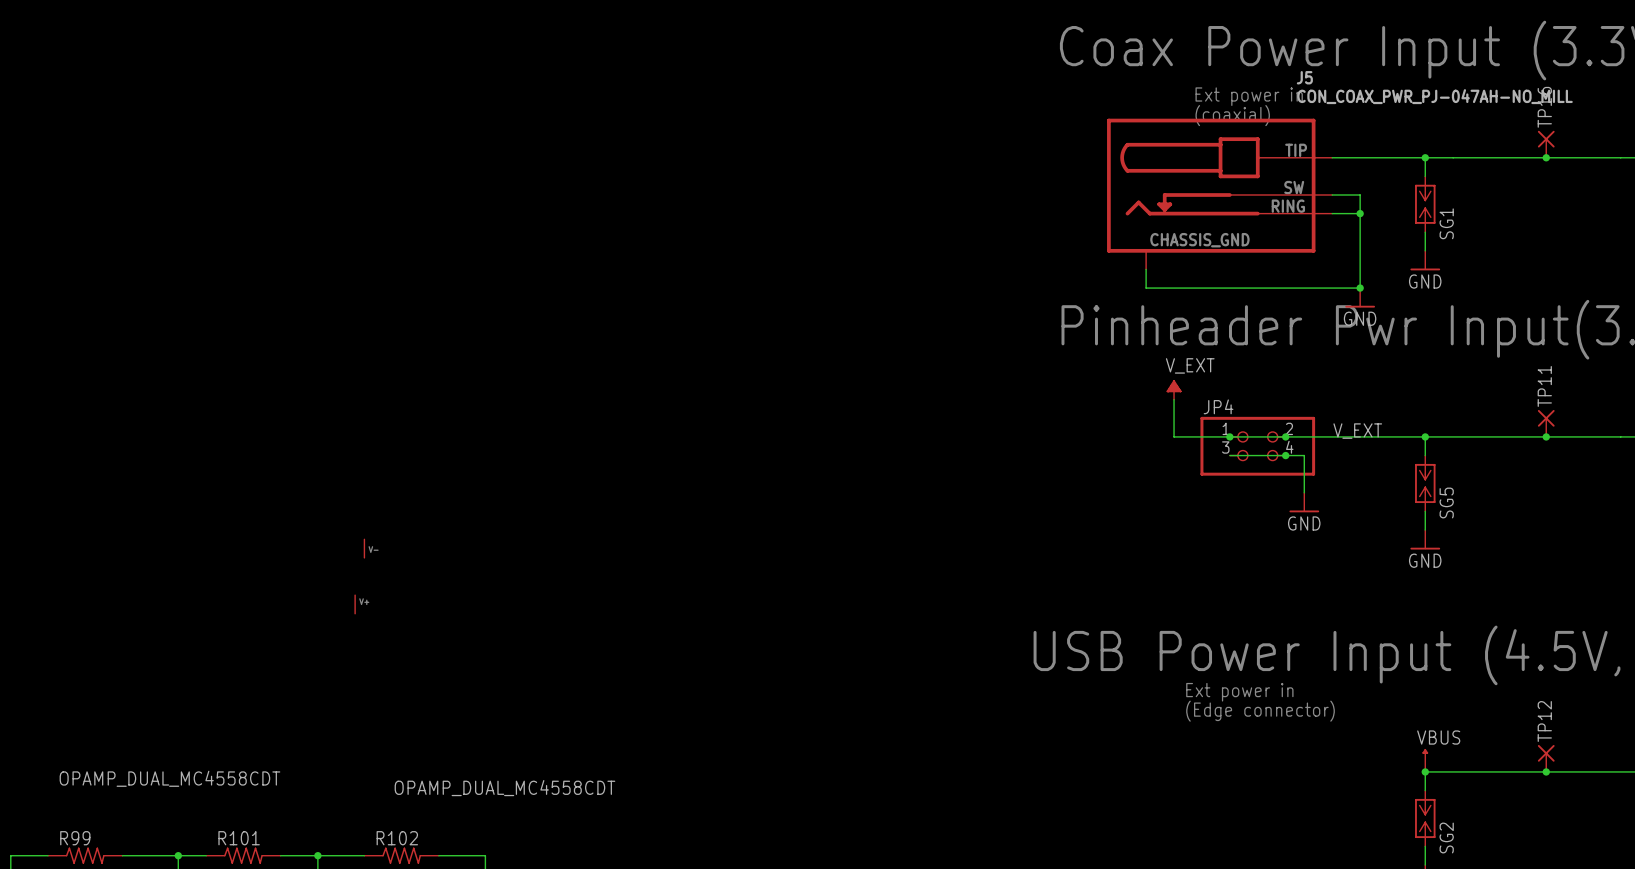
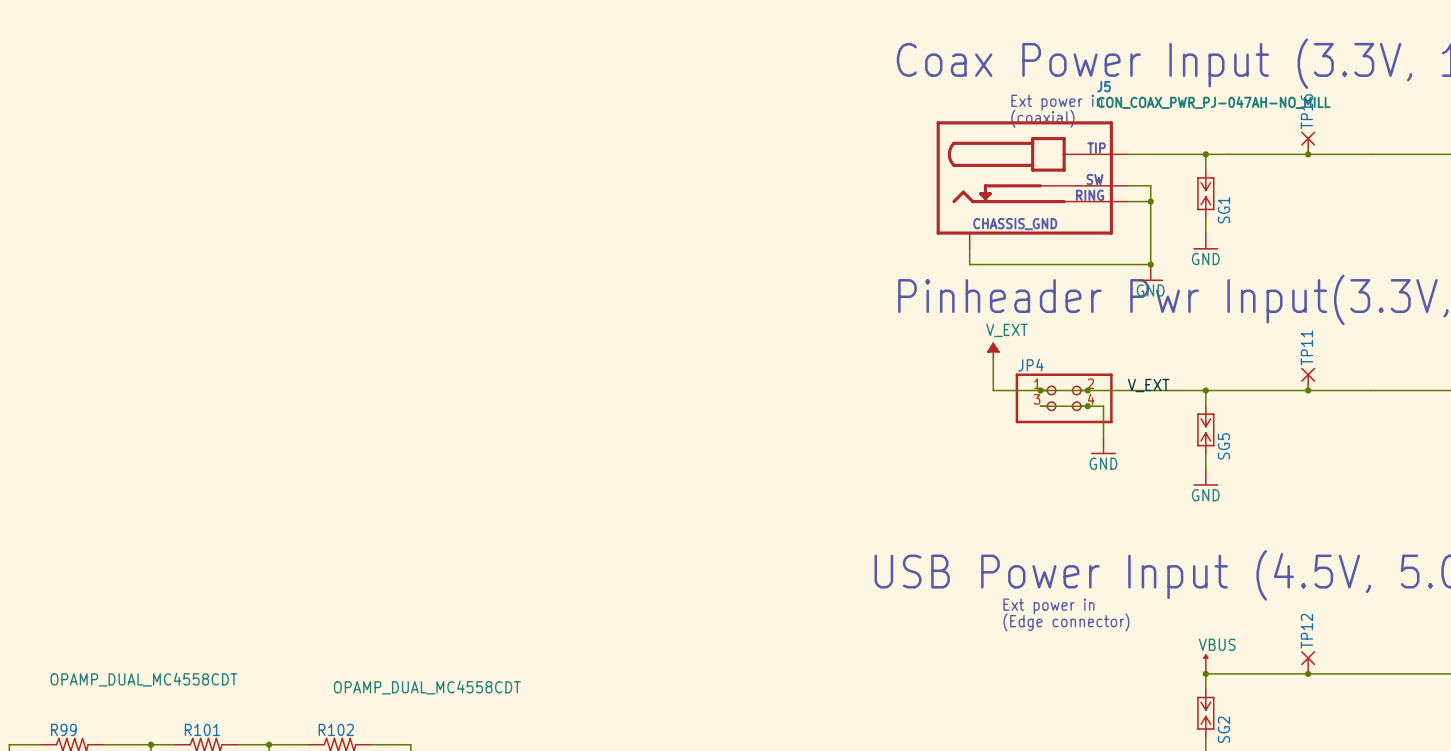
part: (364, 548) -> none
part: (355, 604) -> none

